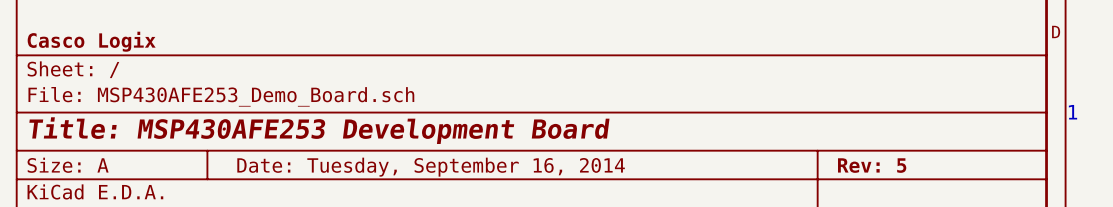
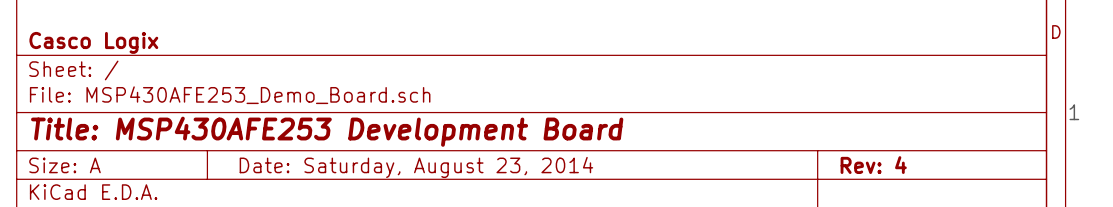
title block: Rev: 5 (872, 165) -> Rev: 4 (873, 165)
title block: Date: Tuesday, September 16, 2014 (431, 167) -> Date: Saturday, August 23, 2014 (416, 167)

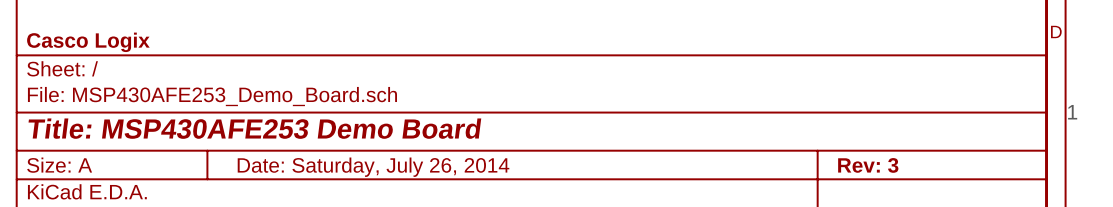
title block: Title: MSP430AFE253 Development Board (327, 131) -> Title: MSP430AFE253 Demo Board (254, 128)
title block: Rev: 4 (873, 165) -> Rev: 3 (868, 165)
title block: Date: Saturday, August 23, 2014 (416, 167) -> Date: Saturday, July 26, 2014 (373, 167)

